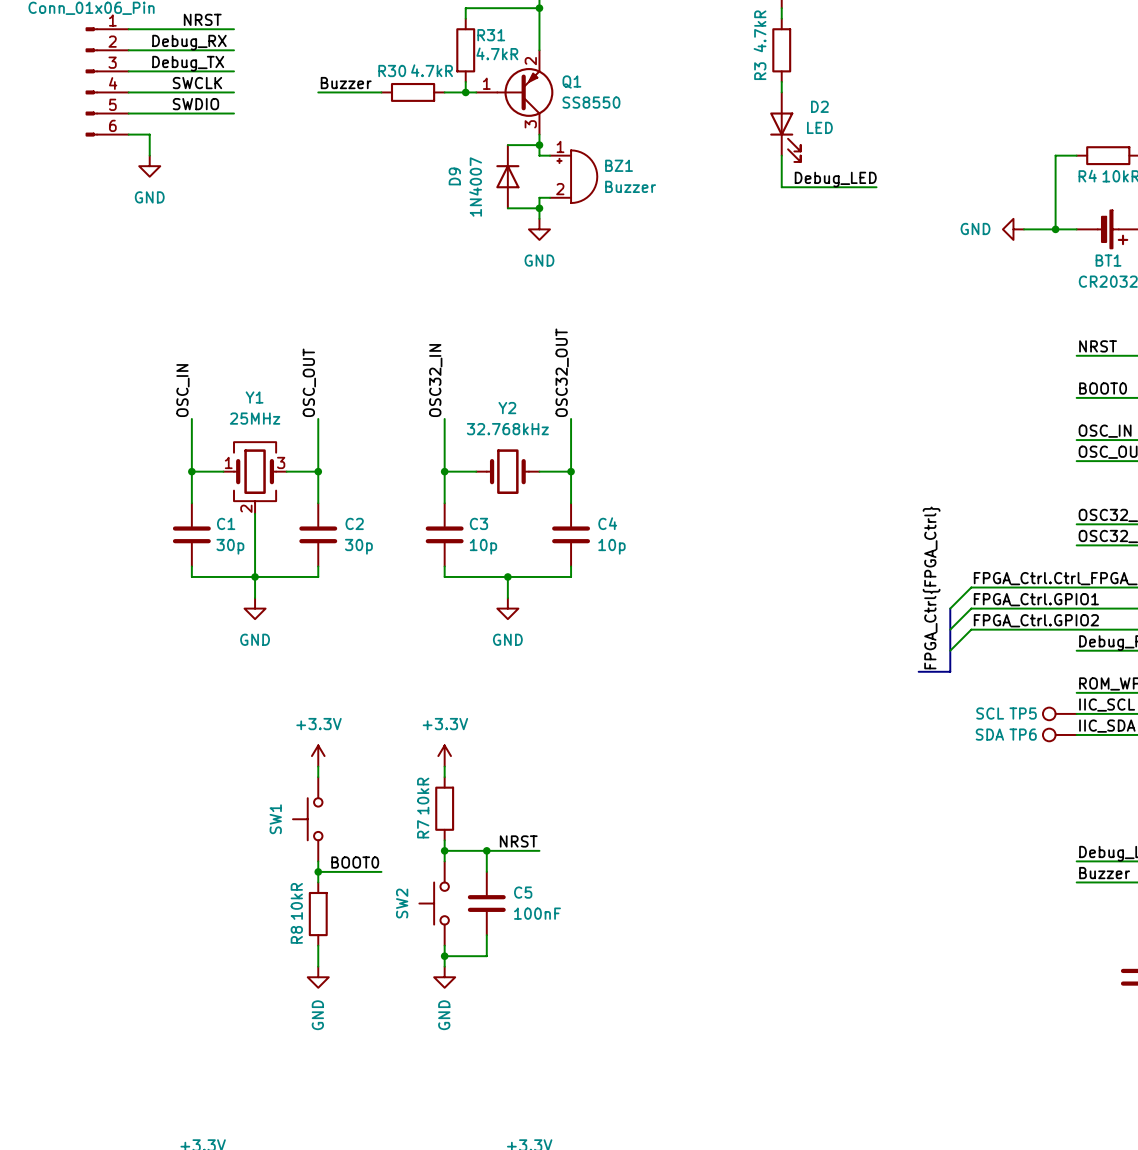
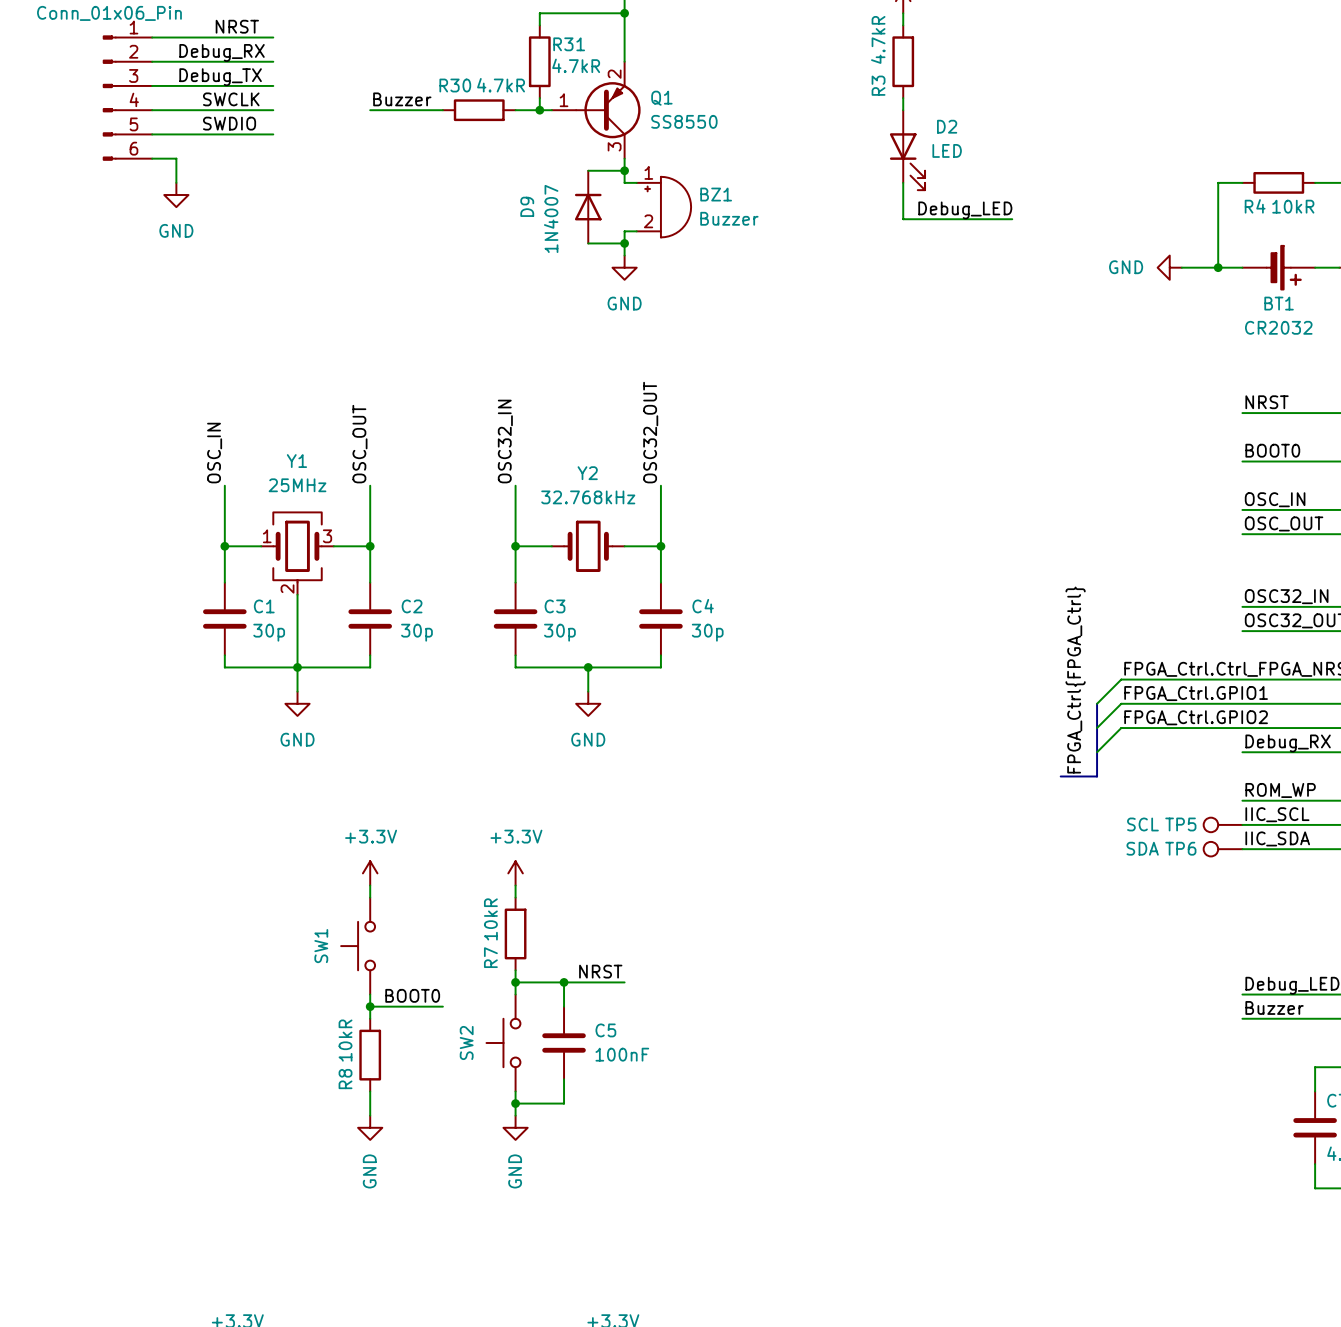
C3 value: 10p (483, 546) -> 30p (559, 632)
C4 value: 10p (611, 546) -> 30p (707, 632)

